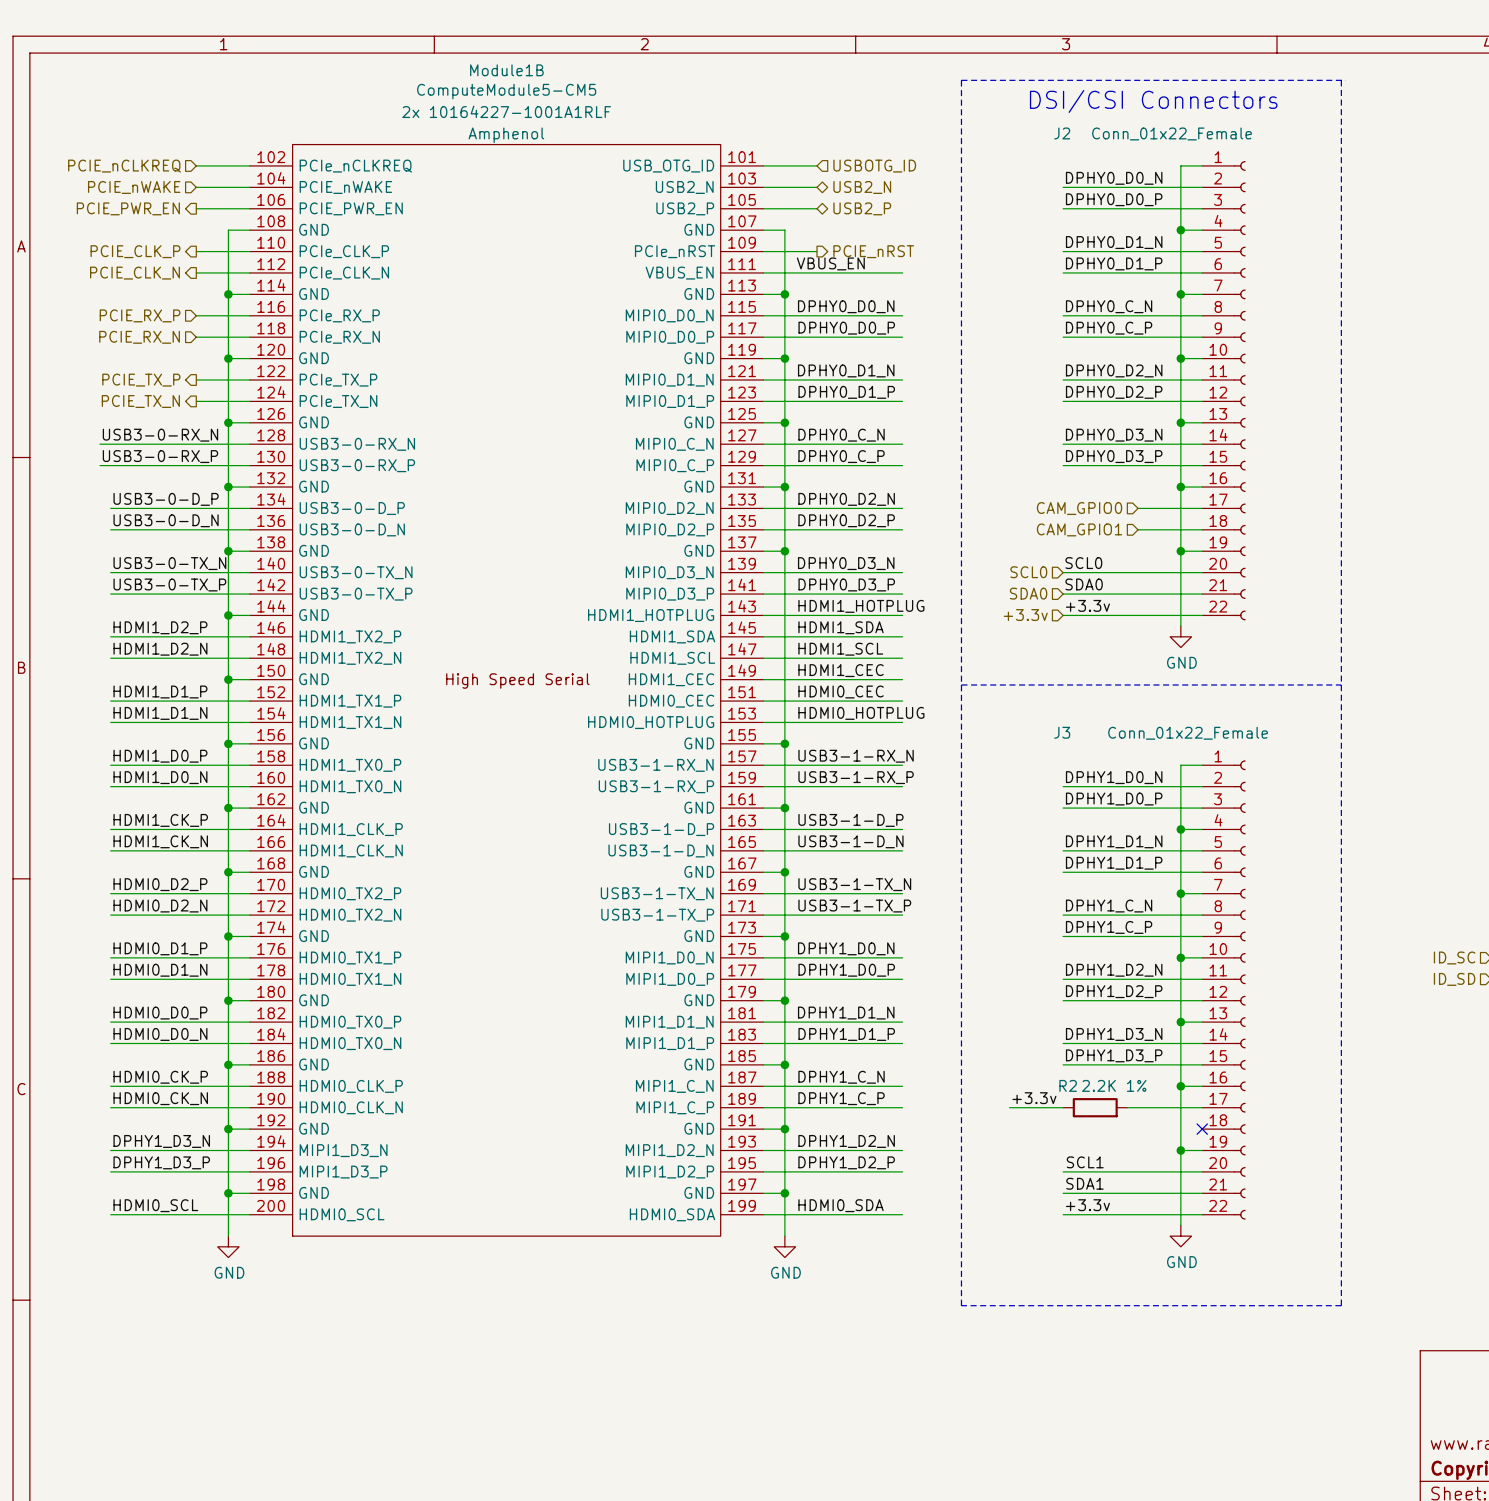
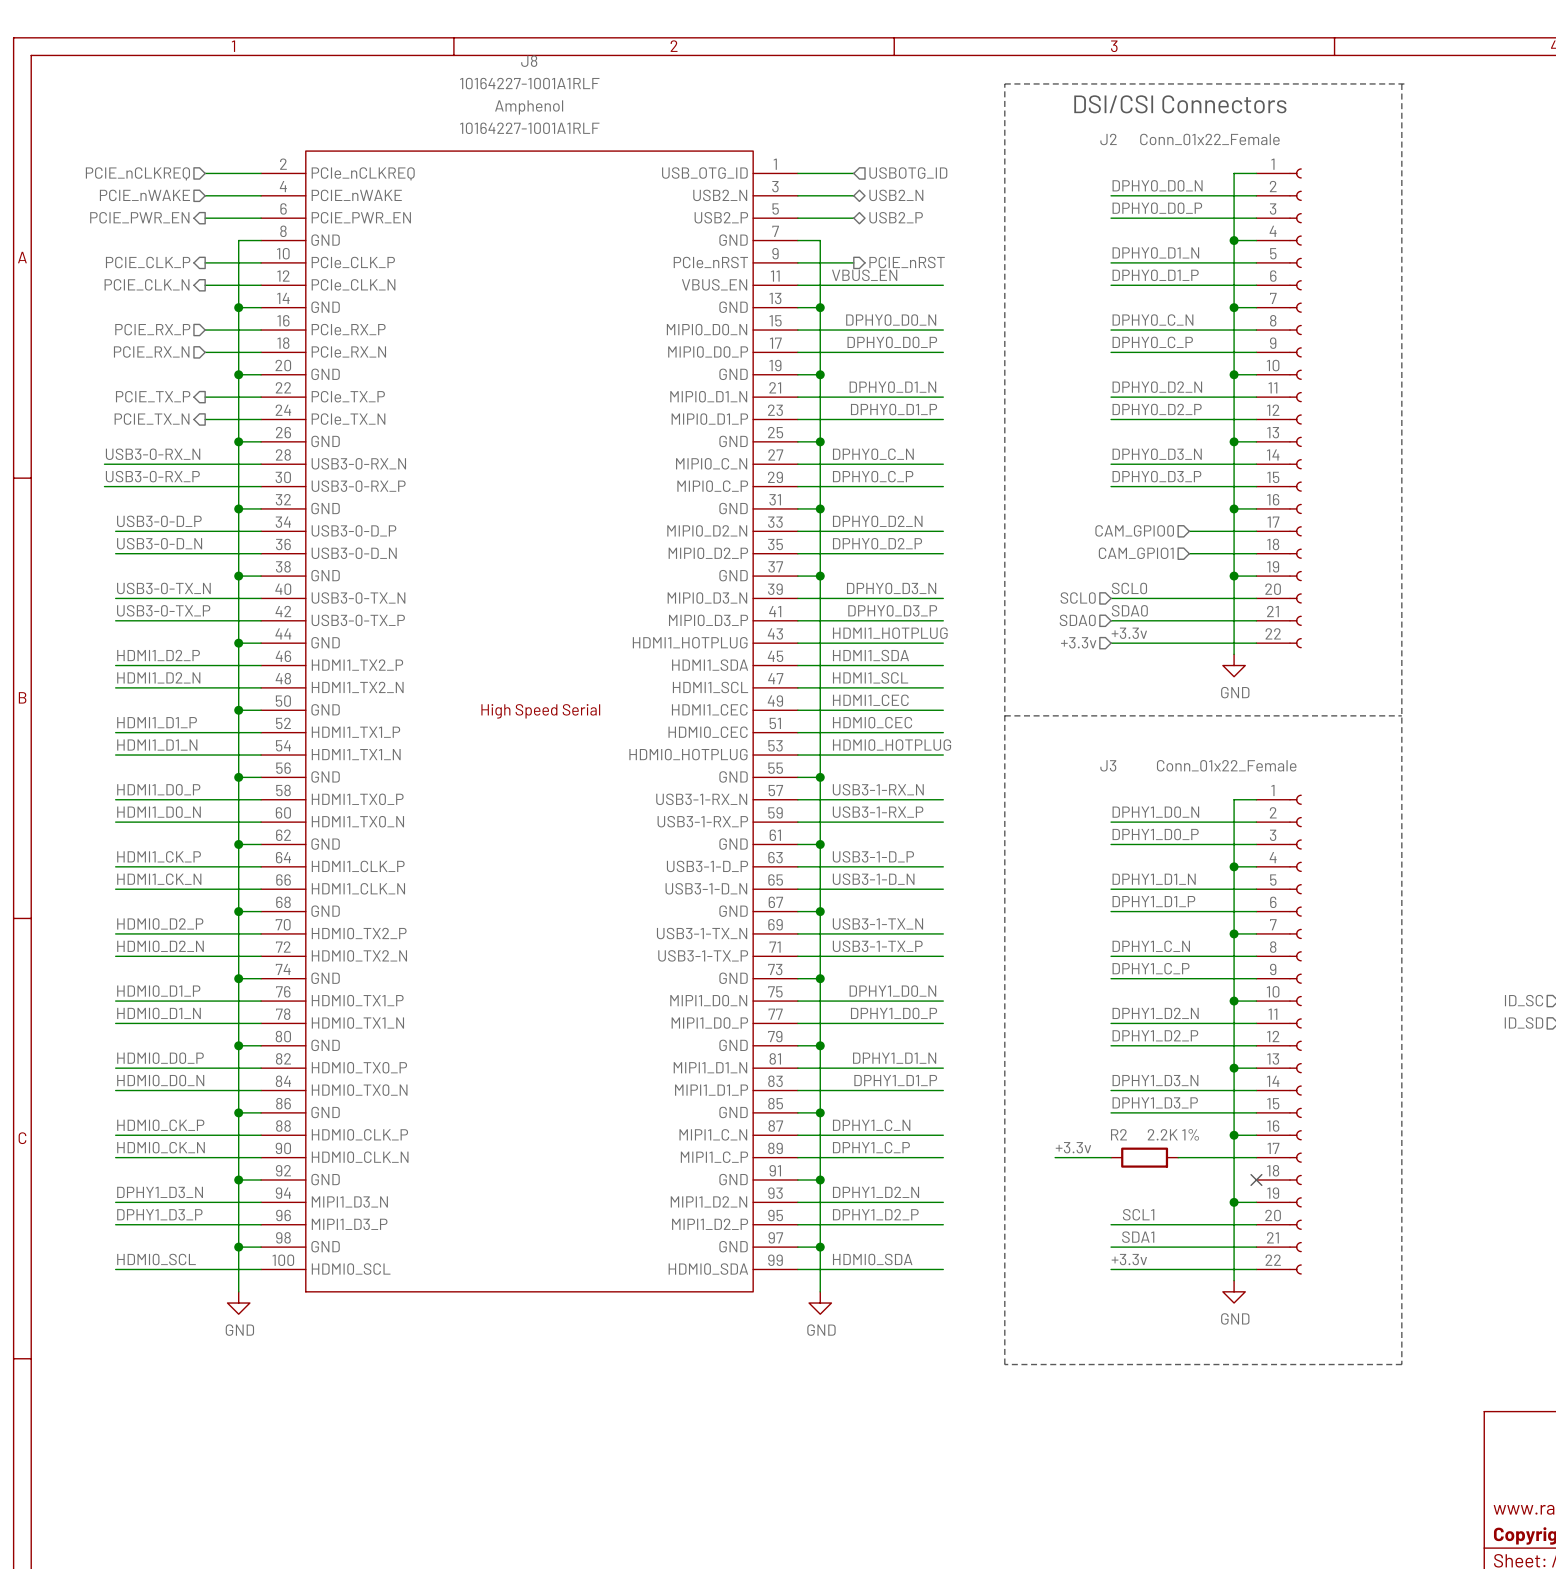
Module1B name: Module1B (506, 70) -> J8 (529, 61)
Module1B value: ComputeModule5-CM5 (506, 91) -> 10164227-1001A1RLF (529, 83)
Module1B text: 2x 10164227-1001A1RLF (506, 111) -> 10164227-1001A1RLF (529, 128)
Module1B text position: Amphenol (506, 135) -> Amphenol (529, 107)
Module1B symbol: [249, 144, 764, 1237] -> [261, 151, 798, 1292]

